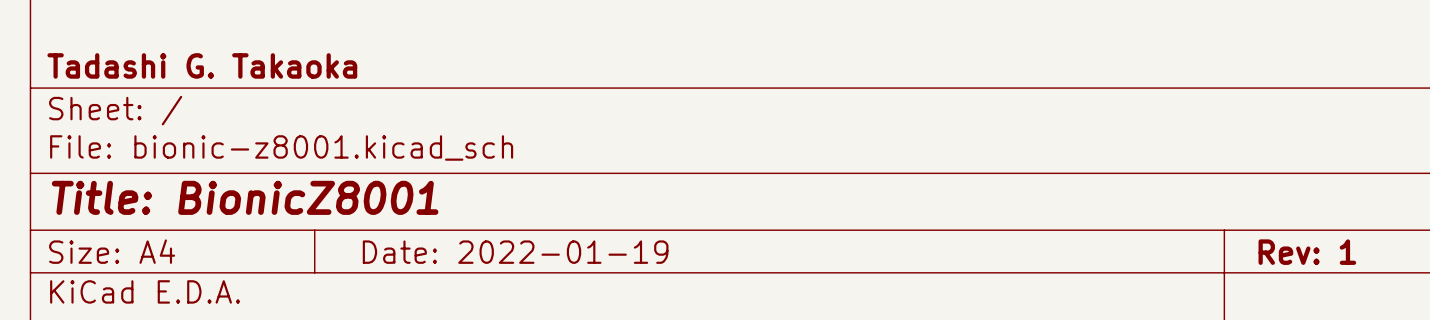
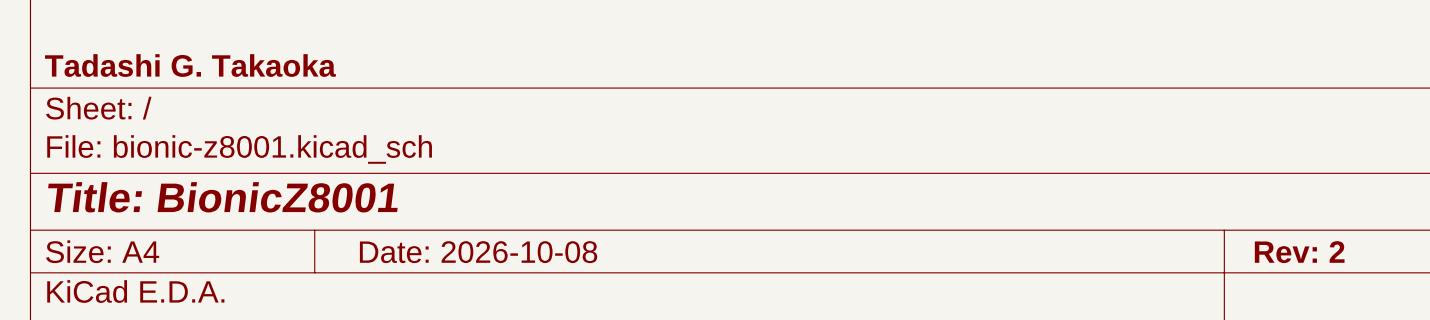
title block: Date: 2022-01-19 (515, 252) -> Date: 2026-10-08 (478, 252)
title block: Rev: 1 (1307, 252) -> Rev: 2 (1299, 252)

